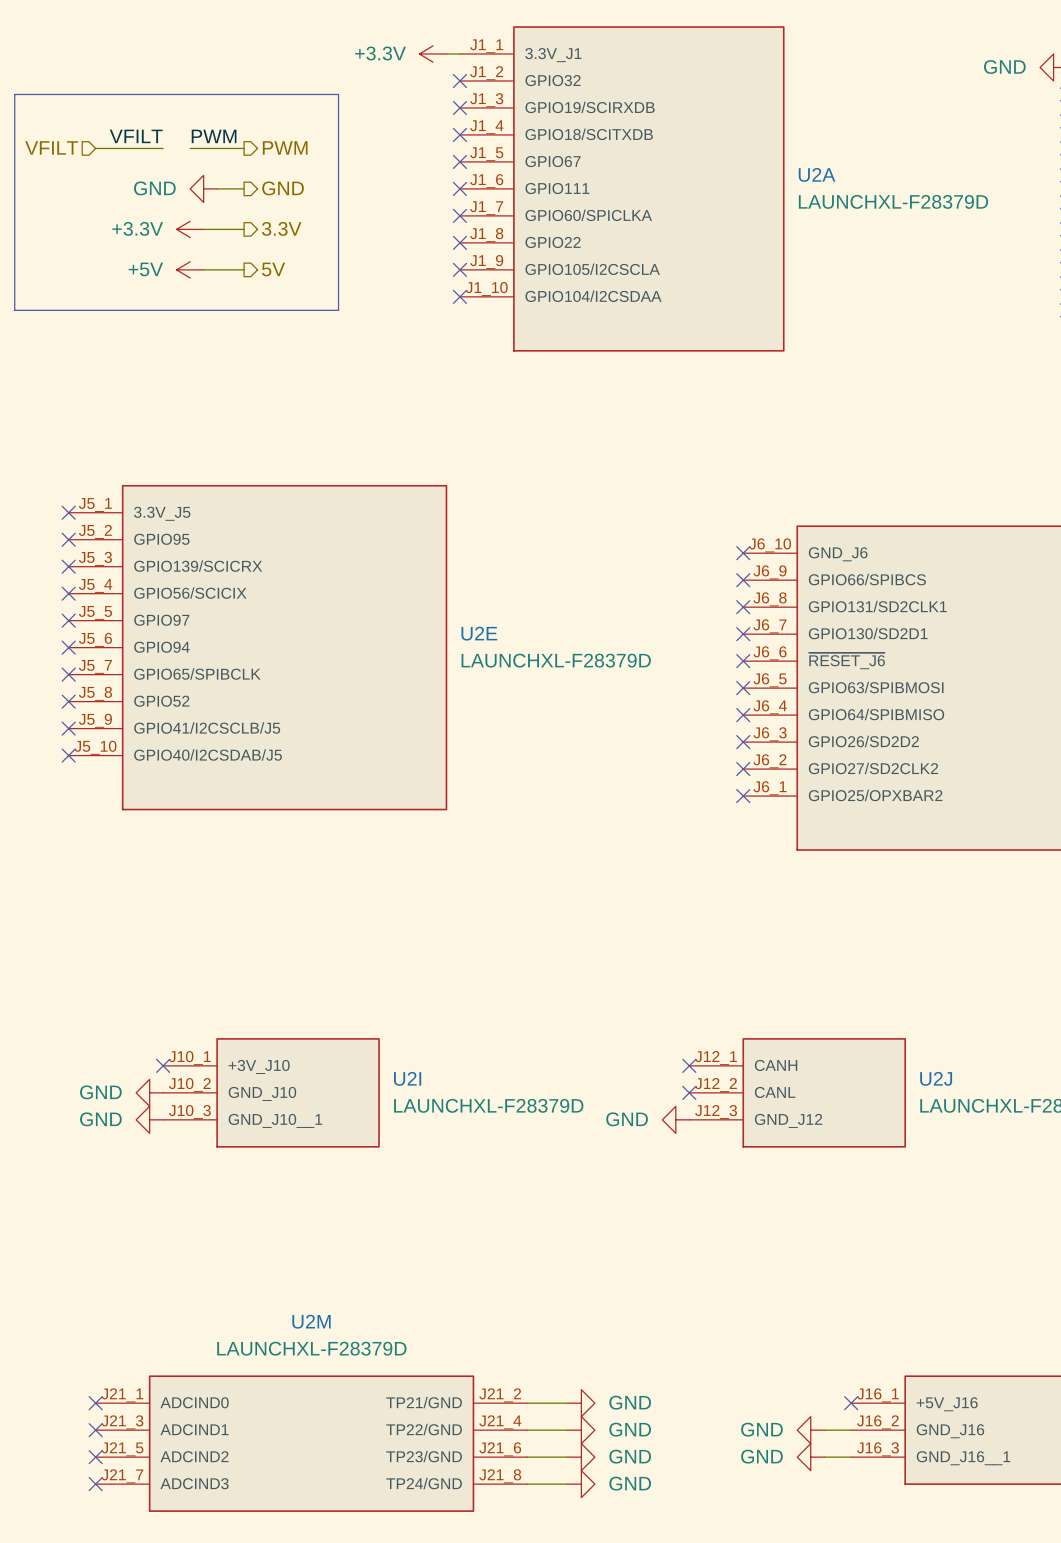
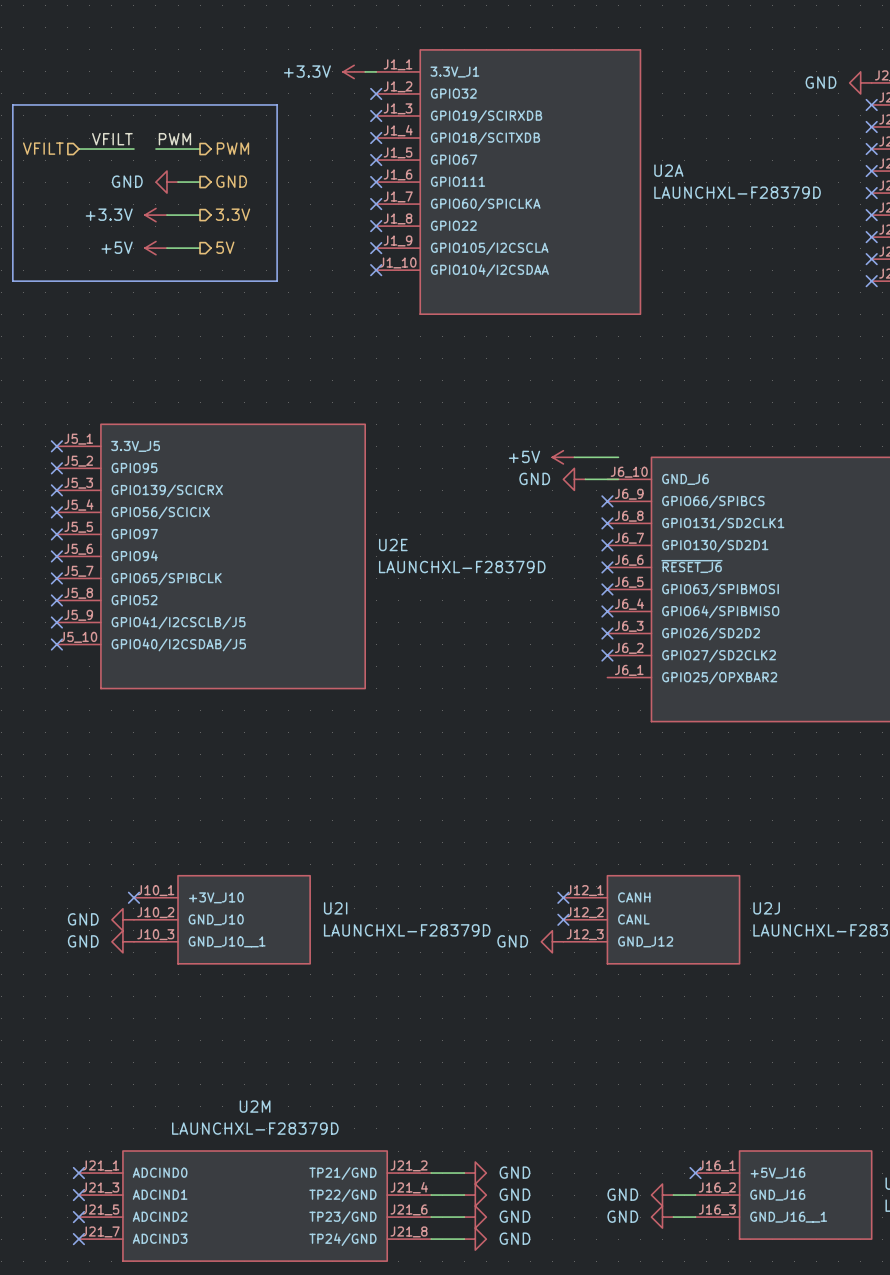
power symbol: none -> +5V (563, 457)
wire: none -> (574, 457) (618, 457)
power symbol: none -> GND (574, 479)
wire: none -> (585, 479) (618, 479)
no-connect mark: (743, 553) -> none
no-connect mark: (743, 796) -> none

